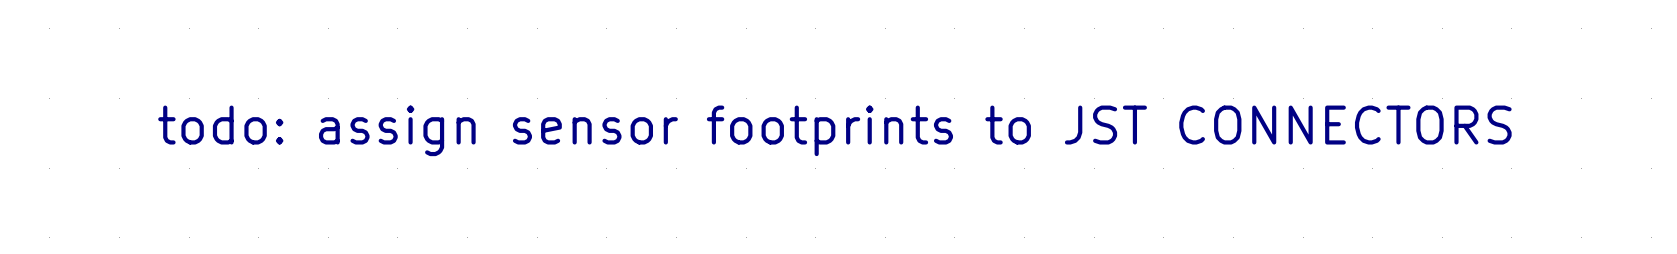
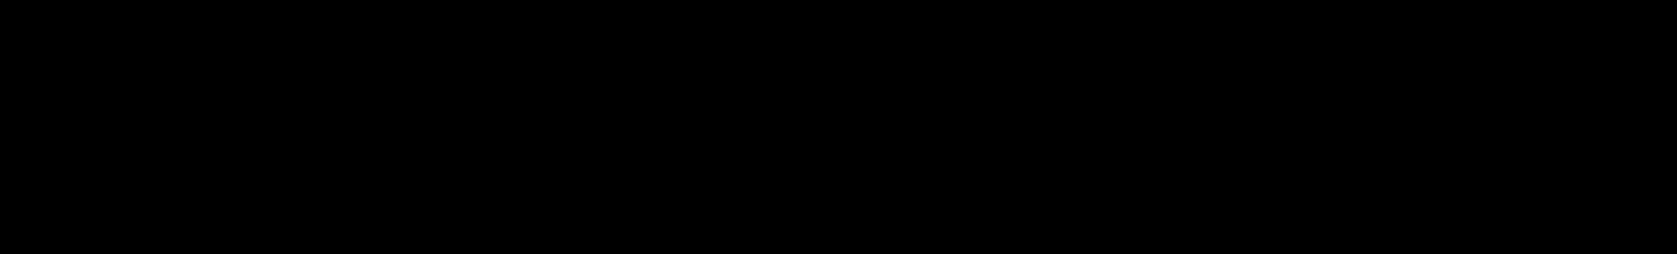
text: todo: assign sensor footprints to JST CONNECTORS (834, 130) -> none

